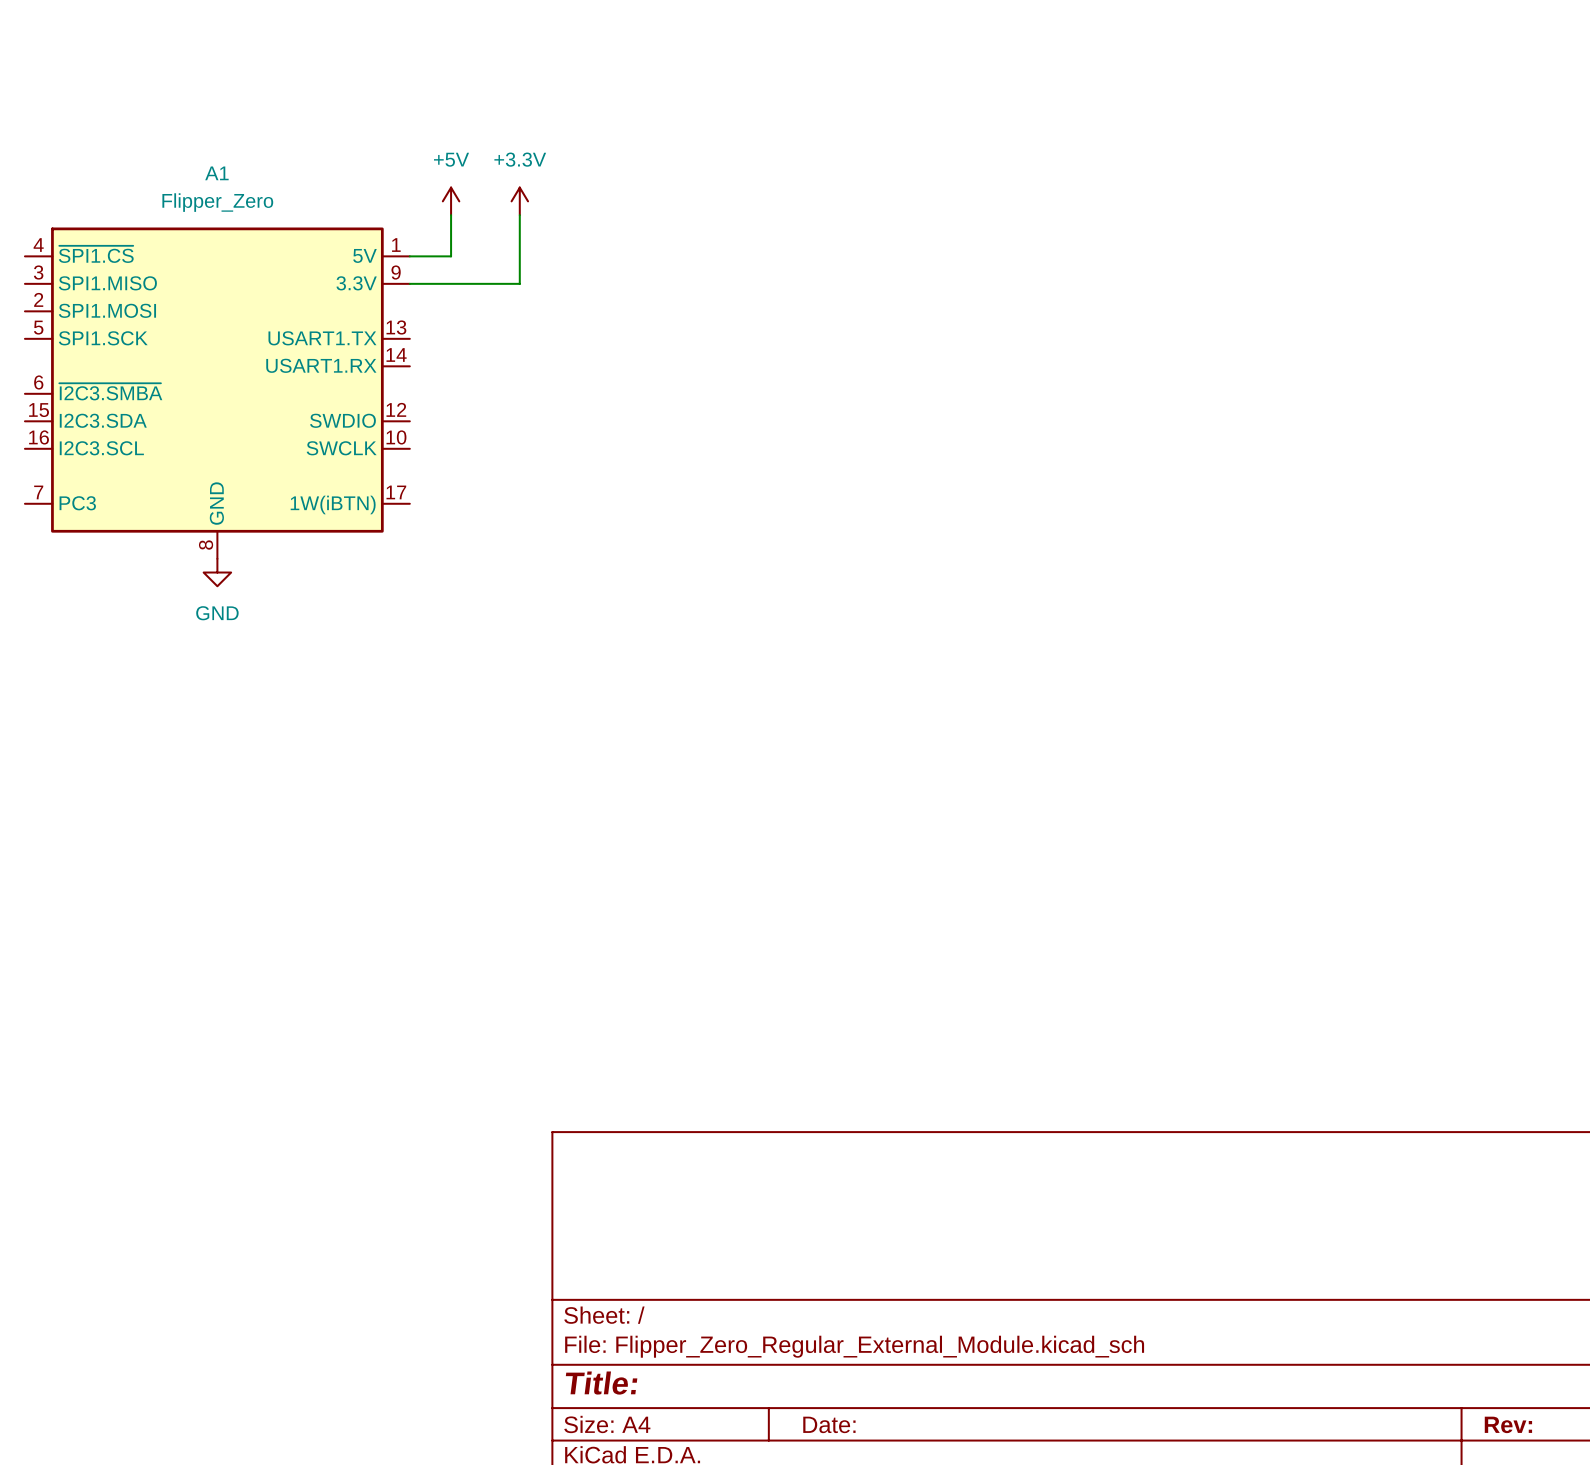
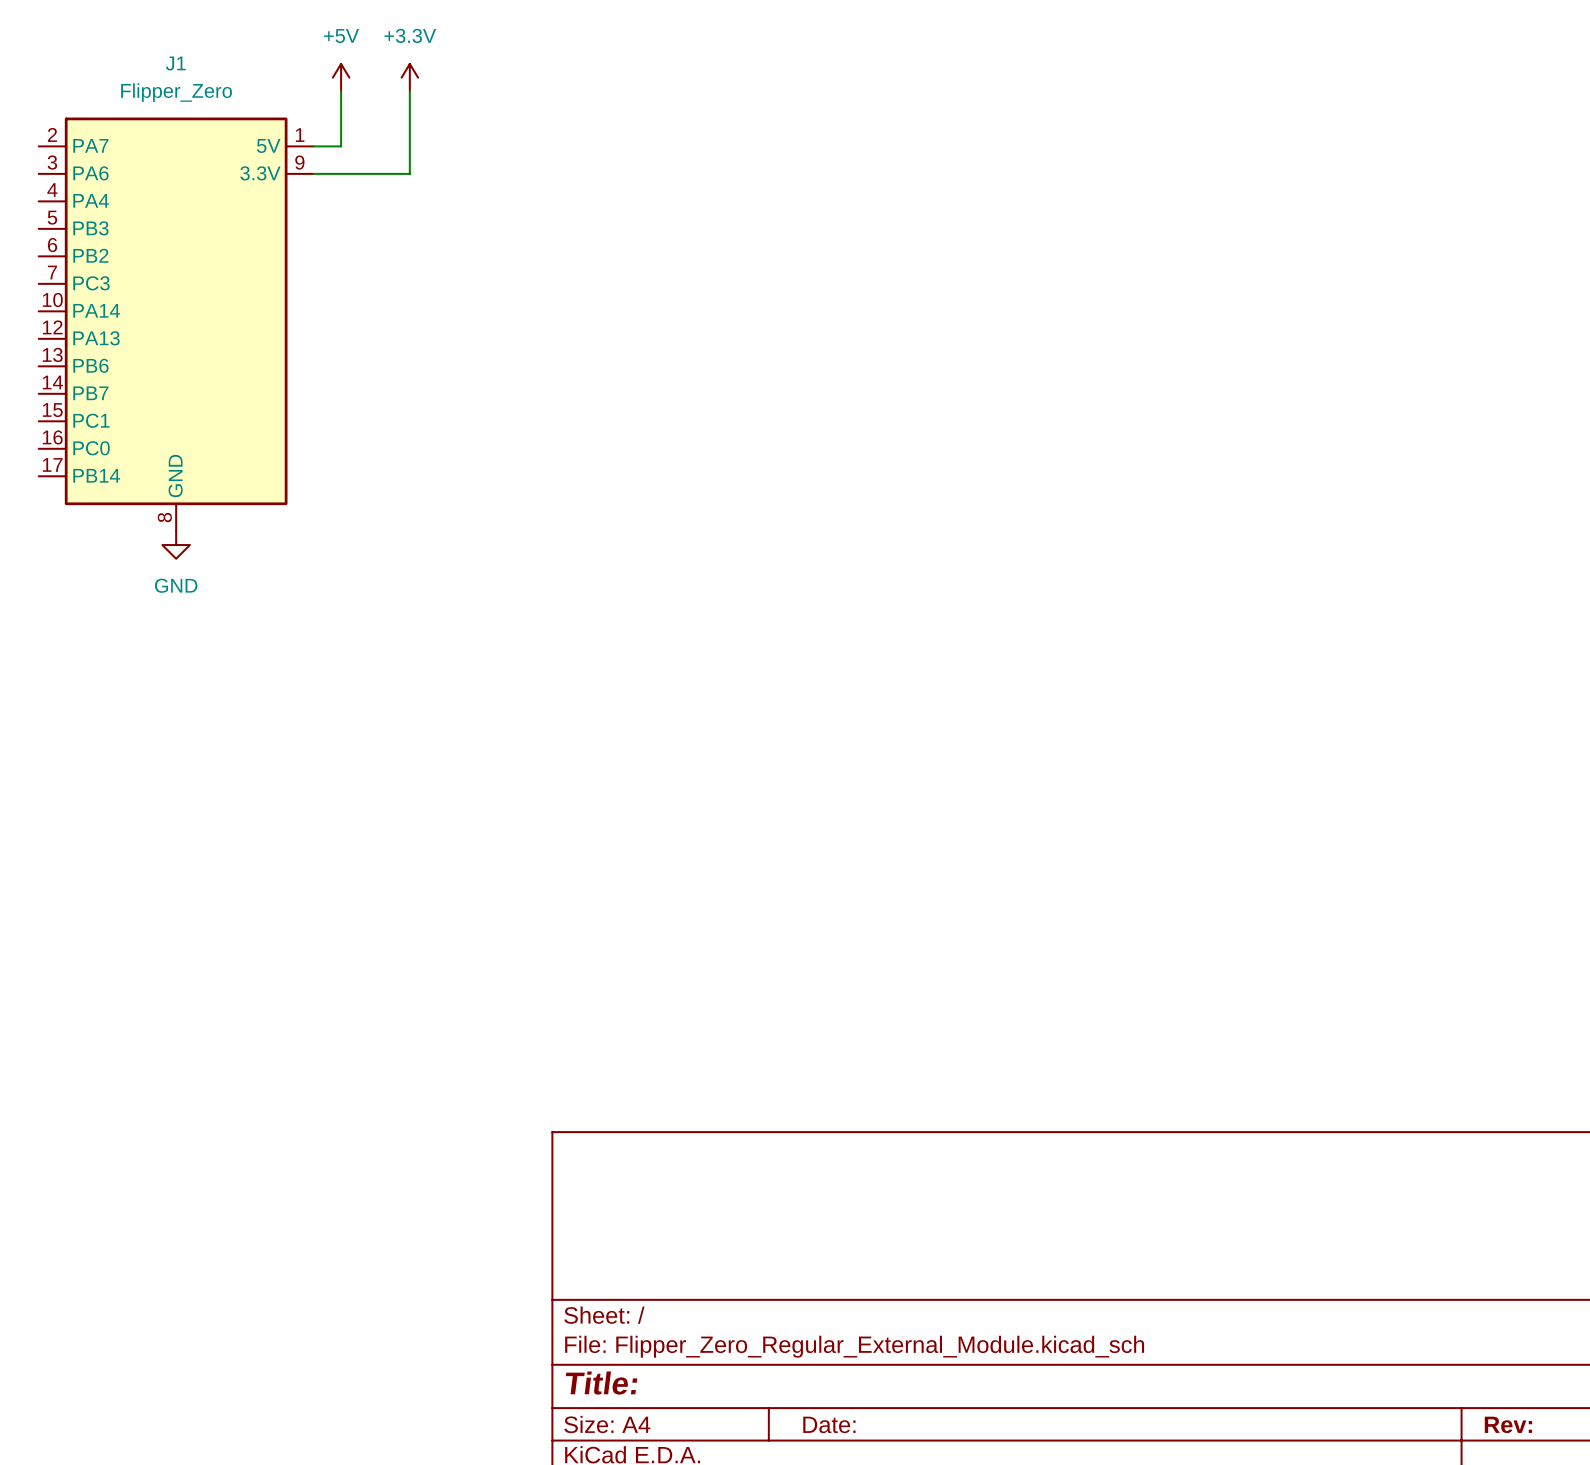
wire: none -> (341, 91) (341, 146) (313, 146)
wire: none -> (409, 91) (409, 173) (313, 173)
power symbol position: +5V (451, 201) -> +5V (341, 77)
power symbol position: +3.3V (519, 201) -> +3.3V (409, 77)
wire: (451, 215) (451, 256) (409, 256) -> none
wire: (519, 215) (519, 283) (409, 283) -> none
J1: none -> Flipper_Zero (176, 324)
A1: Flipper_Zero (217, 393) -> none
power symbol position: GND (217, 572) -> GND (176, 545)

